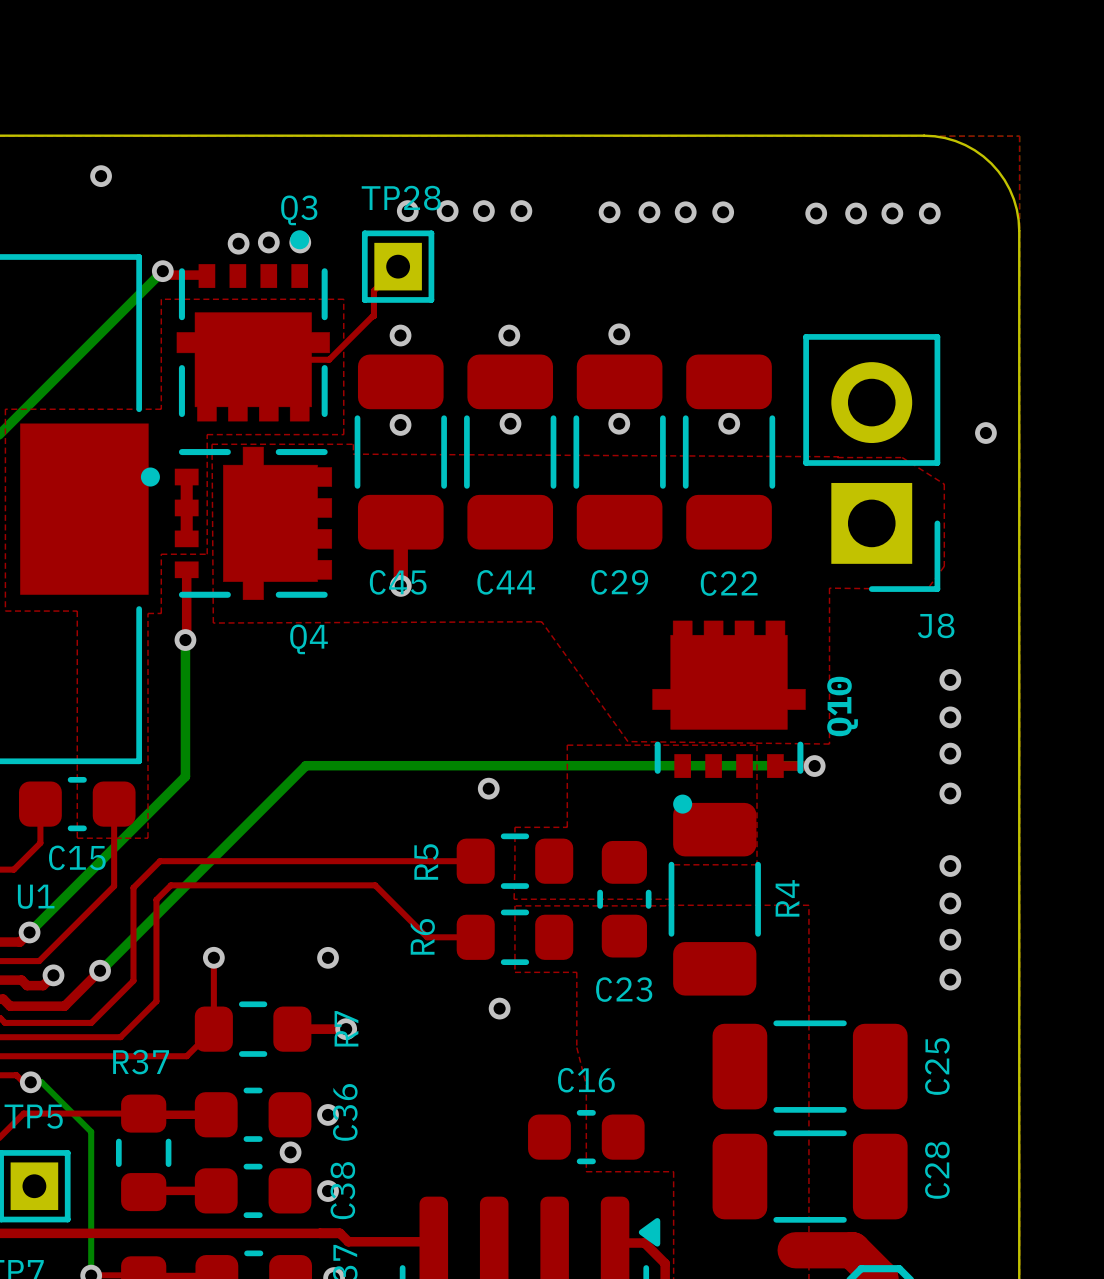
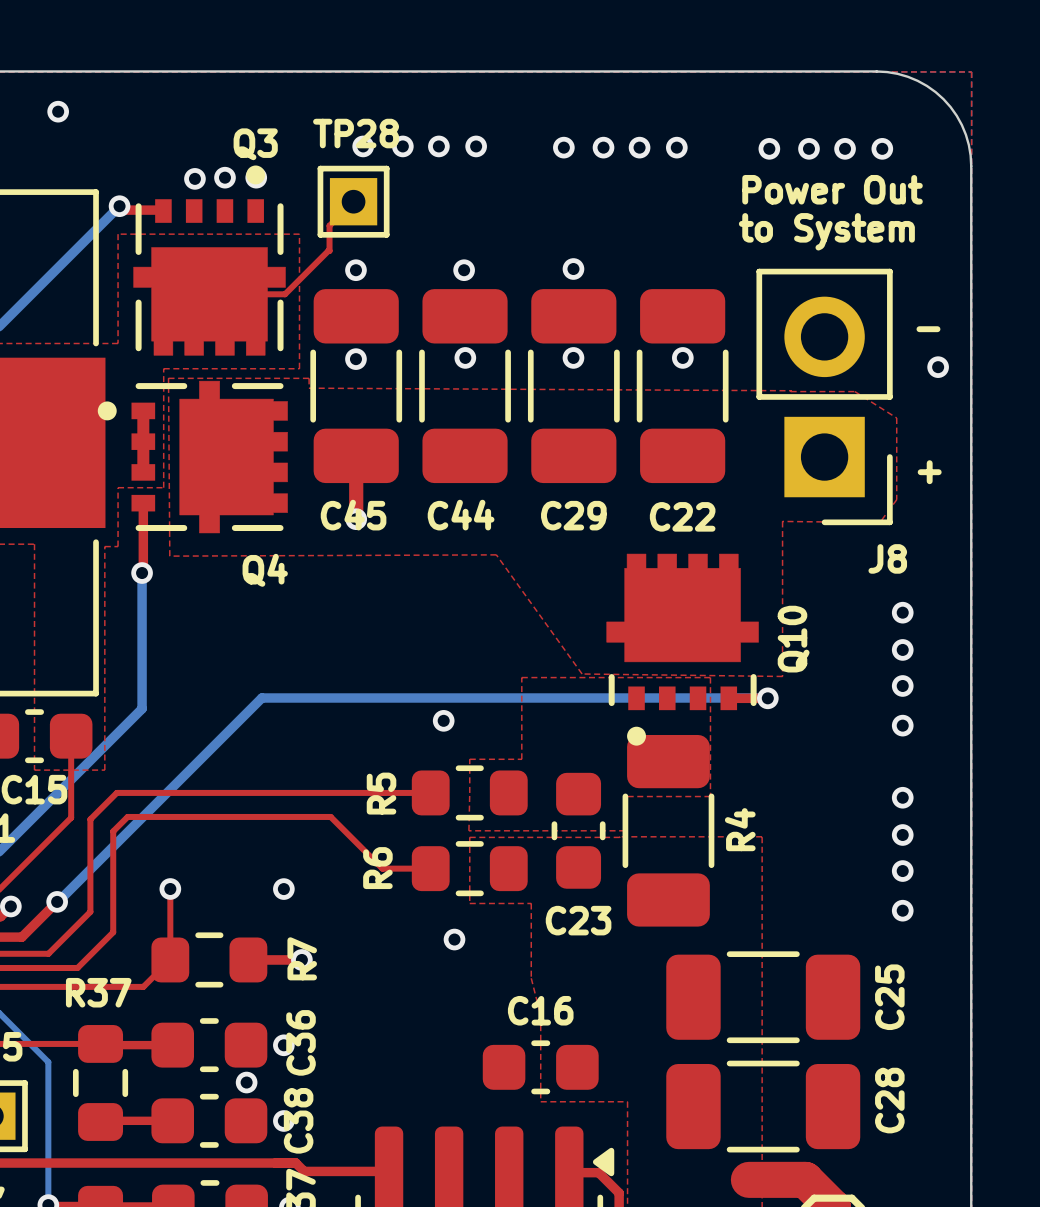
text: none -> Power Out (832, 189)
text: none -> to System (826, 231)
text: none -> - (928, 329)
text: none -> + (929, 472)

